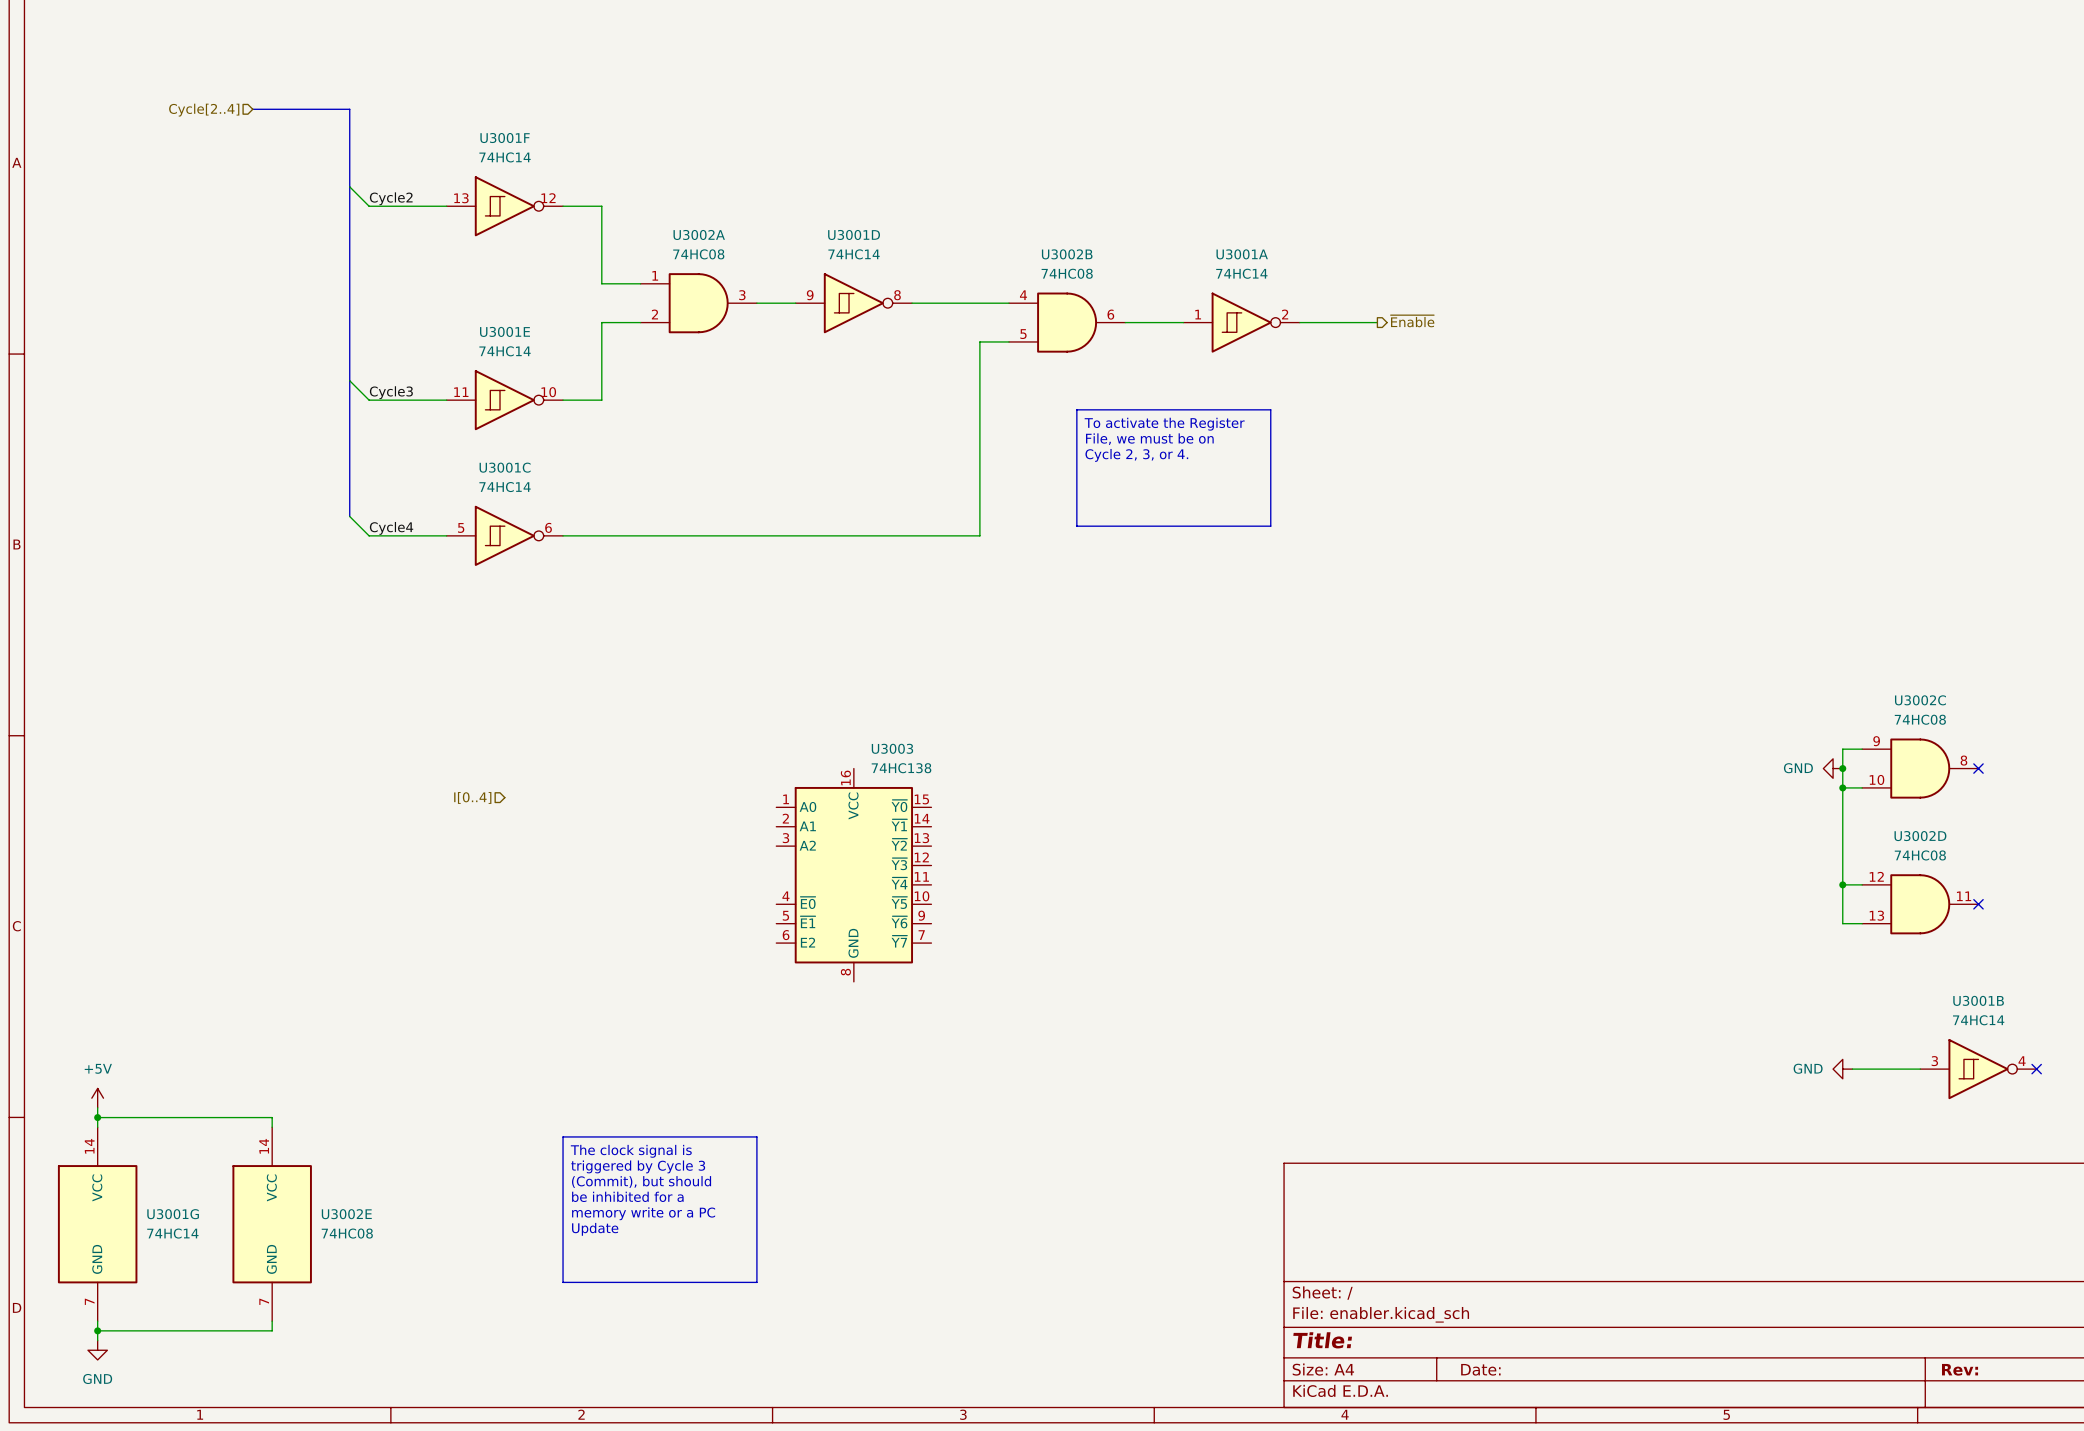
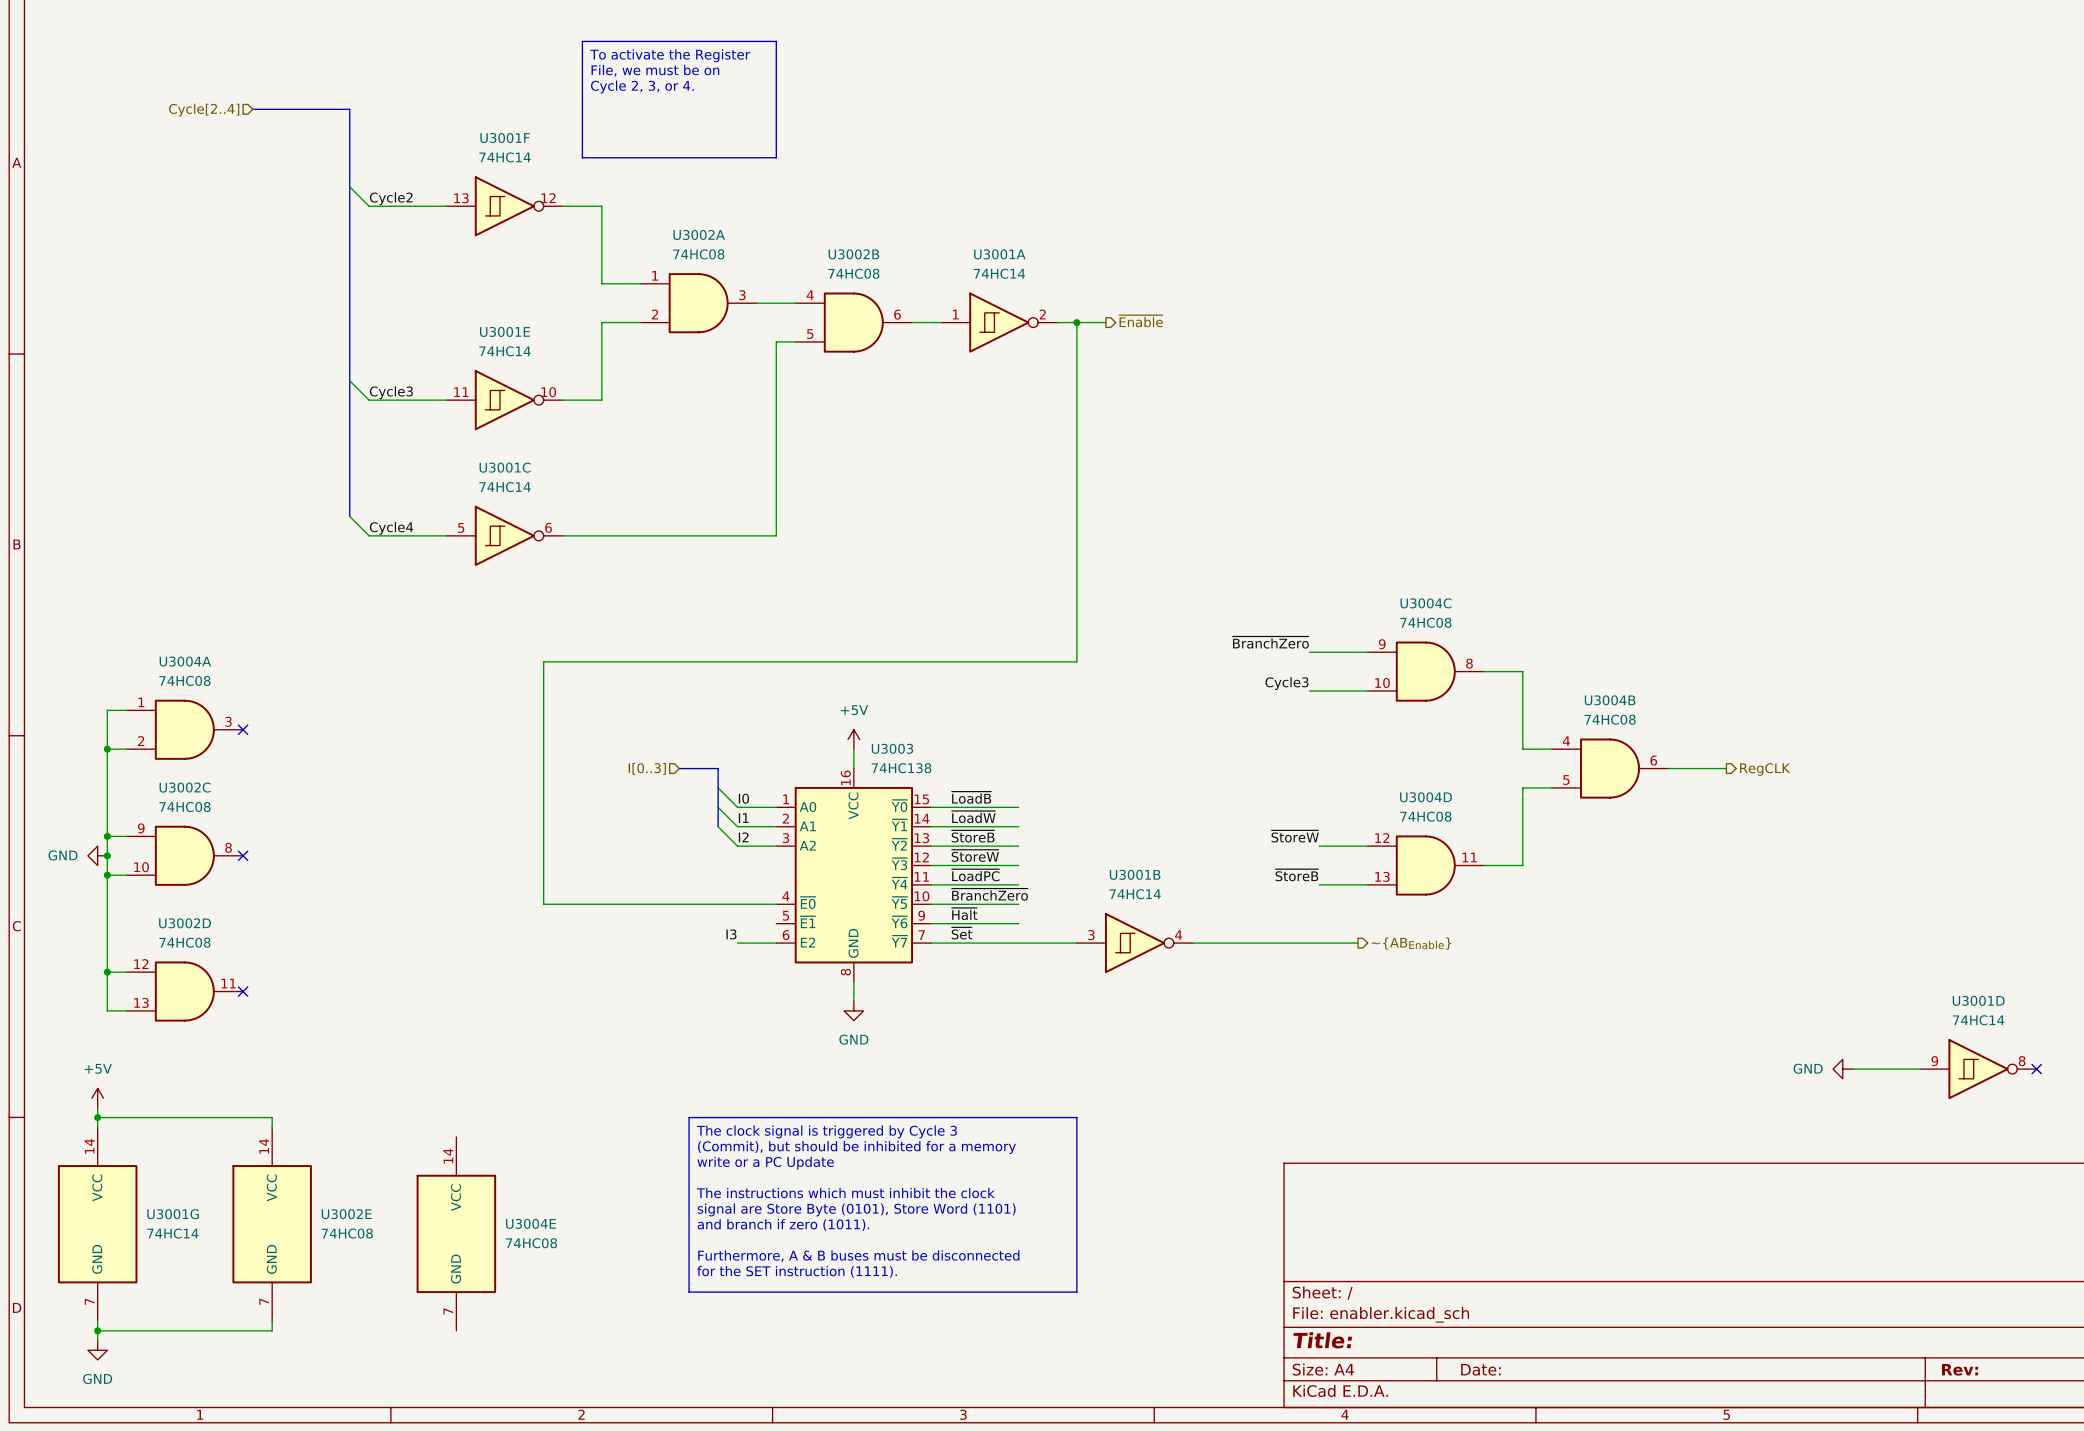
line: none -> (582, 41) (776, 41) (776, 157) (582, 157) (582, 41)
text: none -> To activate the Register (670, 55)
text: none -> File, we must be on (655, 70)
text: none -> Cycle 2, 3, or 4. (642, 86)
U3001D position: (853, 303) -> (1978, 1069)
wire: (912, 303) (1008, 303) -> none
hierarchical label: none -> ~{Enable} (1141, 321)
hierarchical label: ~{Enable} (1412, 321) -> none
wire: none -> (912, 322) (941, 322)
U3002B position: (1067, 322) -> (853, 322)
wire: none -> (1076, 322) (1076, 661) (543, 661) (543, 904) (776, 904)
junction: none -> (1076, 322)
wire: (1125, 322) (1183, 322) -> none
U3001A position: (1241, 322) -> (999, 322)
wire: (1299, 322) (1377, 322) -> none
wire: (1008, 341) (979, 341) (979, 535) (776, 535) -> (795, 341) (776, 341) (776, 535)
line: (1076, 409) (1270, 409) (1270, 526) (1076, 526) (1076, 409) -> none
text: To activate the Register (1164, 424) -> none
text: File, we must be on (1149, 439) -> none
text: Cycle 2, 3, or 4. (1136, 455) -> none
label: none -> ~{BranchZero} (1270, 642)
wire: none -> (1309, 652) (1367, 652)
U3004C: none -> 74HC08 (1425, 671)
wire: none -> (1484, 671) (1522, 671) (1522, 749) (1551, 749)
label: none -> Cycle3 (1286, 683)
wire: none -> (1309, 690) (1367, 690)
wire: none -> (126, 710) (107, 710) (107, 1010) (126, 1010)
U3004A: none -> 74HC08 (184, 729)
no-connect mark: none -> (243, 729)
power symbol: none -> +5V (853, 739)
wire: none -> (107, 749) (126, 749)
junction: none -> (107, 749)
wire: none -> (853, 749) (853, 768)
wire: (1862, 749) (1842, 749) (1842, 923) (1862, 923) -> none
hierarchical label: none -> I[0..3] (647, 768)
bus: none -> (679, 768) (718, 768) (718, 826)
U3004B: none -> 74HC08 (1610, 768)
wire: none -> (1668, 768) (1726, 768)
power symbol: GND (1833, 768) -> none
junction: (1842, 768) -> none
U3002C position: (1920, 768) -> (184, 855)
no-connect mark: (1978, 768) -> none
hierarchical label: none -> RegCLK (1765, 769)
wire: none -> (718, 787) (737, 807) (776, 807)
wire: none -> (1551, 787) (1522, 787) (1522, 865) (1484, 865)
wire: (1842, 787) (1862, 787) -> none
junction: (1842, 787) -> none
hierarchical label: I[0..4] (472, 797) -> none
label: none -> ~{LoadB} (971, 797)
label: none -> I0 (743, 798)
wire: none -> (718, 807) (737, 826) (776, 826)
wire: none -> (931, 807) (1018, 807)
label: none -> ~{LoadW} (973, 817)
label: none -> I1 (743, 818)
wire: none -> (718, 826) (737, 846) (776, 846)
wire: none -> (931, 826) (1018, 826)
wire: none -> (107, 836) (126, 836)
junction: none -> (107, 836)
label: none -> ~{StoreB} (973, 836)
label: none -> ~{StoreW} (1295, 836)
label: none -> I2 (743, 837)
wire: none -> (931, 846) (1018, 846)
wire: none -> (1319, 846) (1367, 846)
power symbol: none -> GND (97, 855)
junction: none -> (107, 855)
no-connect mark: none -> (243, 855)
label: none -> ~{StoreW} (975, 855)
wire: none -> (931, 865) (1018, 865)
U3004D: none -> 74HC08 (1425, 865)
wire: none -> (107, 875) (126, 875)
junction: none -> (107, 875)
label: none -> ~{LoadPC} (975, 875)
label: none -> ~{StoreB} (1296, 875)
wire: none -> (931, 884) (1018, 884)
wire: none -> (1319, 884) (1367, 884)
wire: (1842, 884) (1862, 884) -> none
junction: (1842, 884) -> none
label: none -> ~{BranchZero} (989, 894)
wire: none -> (931, 904) (1018, 904)
U3002D position: (1920, 904) -> (184, 991)
no-connect mark: (1978, 904) -> none
label: none -> ~{Halt} (964, 914)
wire: none -> (931, 923) (1018, 923)
label: none -> ~{Set} (962, 933)
label: none -> I3 (731, 934)
wire: none -> (737, 943) (776, 943)
wire: none -> (931, 943) (1076, 943)
wire: none -> (1193, 943) (1358, 943)
hierarchical label: none -> ~{ABEnable} (1411, 943)
wire: none -> (107, 972) (126, 972)
junction: none -> (107, 972)
wire: none -> (853, 981) (853, 1001)
no-connect mark: none -> (243, 991)
power symbol: none -> GND (853, 1010)
U3001B position: (1978, 1069) -> (1135, 943)
line: none -> (689, 1117) (1076, 1117) (1076, 1292) (689, 1292) (689, 1117)
line: (563, 1136) (756, 1136) (756, 1282) (563, 1282) (563, 1136) -> none
text: none -> (Commit), but should be inhibited for a memory (856, 1147)
text: The clock signal is (631, 1151) -> The clock signal is triggered by Cycle 3 (826, 1131)
text: none -> write or a PC Update (765, 1163)
text: triggered by Cycle 3 (638, 1166) -> none
text: (Commit), but should (641, 1182) -> none
text: none -> The instructions which must inhibit the clock (845, 1193)
text: be inhibited for a (627, 1196) -> none
text: none -> signal are Store Byte (0101), Store Word (1101) (856, 1209)
text: memory write or a PC (643, 1213) -> none
text: none -> and branch if zero (1011). (783, 1225)
text: Update (595, 1229) -> none
U3004E: none -> 74HC08 (456, 1233)
text: none -> Furthermore, A & B buses must be disconnected (858, 1256)
text: none -> for the SET instruction (1111). (797, 1271)

